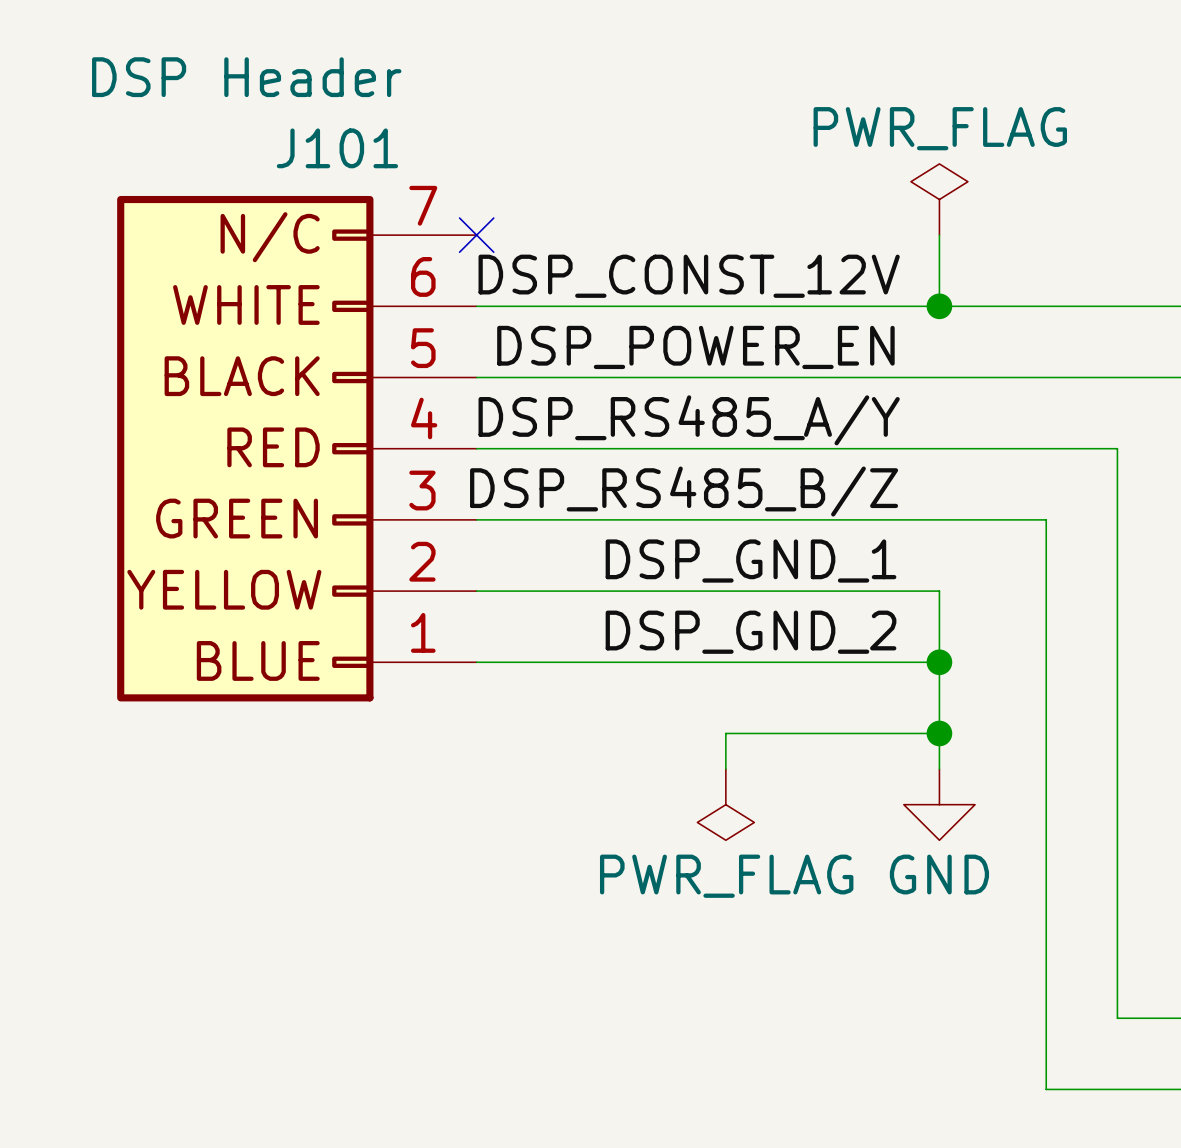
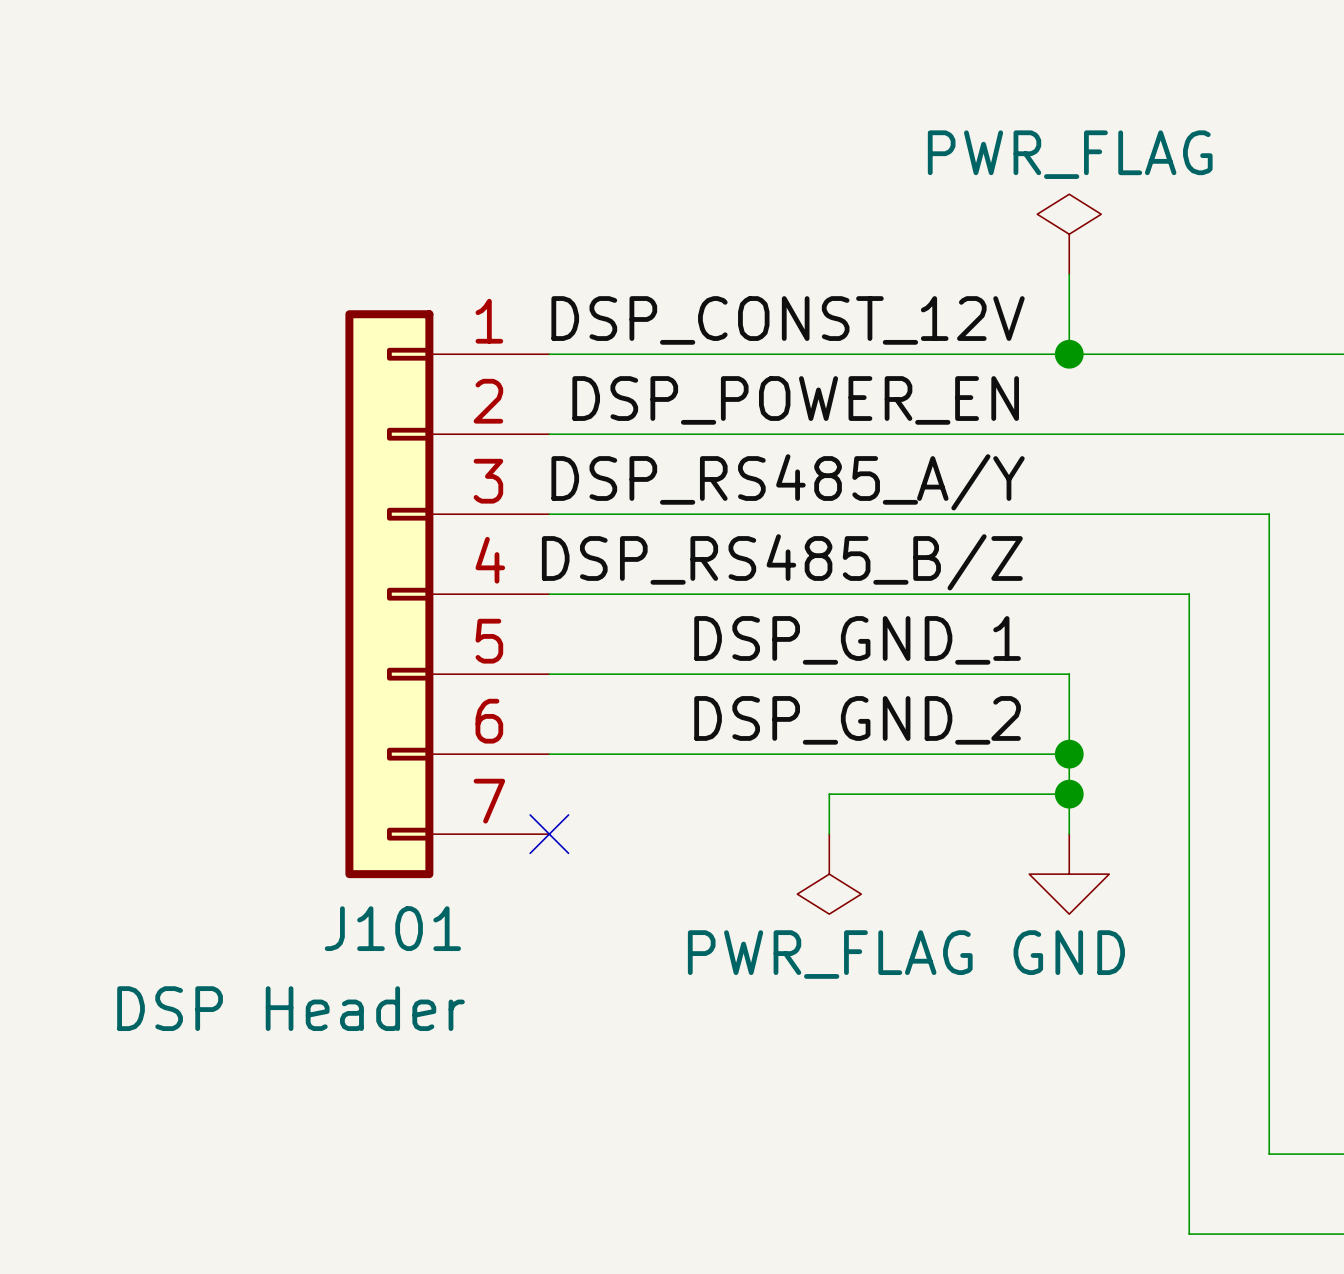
J101 value position: DSP Header (246, 77) -> DSP Header (291, 1008)
J101 name position: J101 (337, 148) -> J101 (392, 928)
J101 symbol: [117, 195, 477, 702] -> [345, 310, 550, 879]
no-connect mark: (476, 235) -> none
wire: none -> (1069, 794) (829, 794) (829, 834)
no-connect mark: none -> (549, 834)
junction position: (939, 733) -> (1069, 794)
wire: (725, 769) (725, 733) (939, 733) (939, 769) -> none
power symbol position: PWR_FLAG (725, 804) -> PWR_FLAG (829, 874)
power symbol position: GND (939, 804) -> GND (1069, 874)

